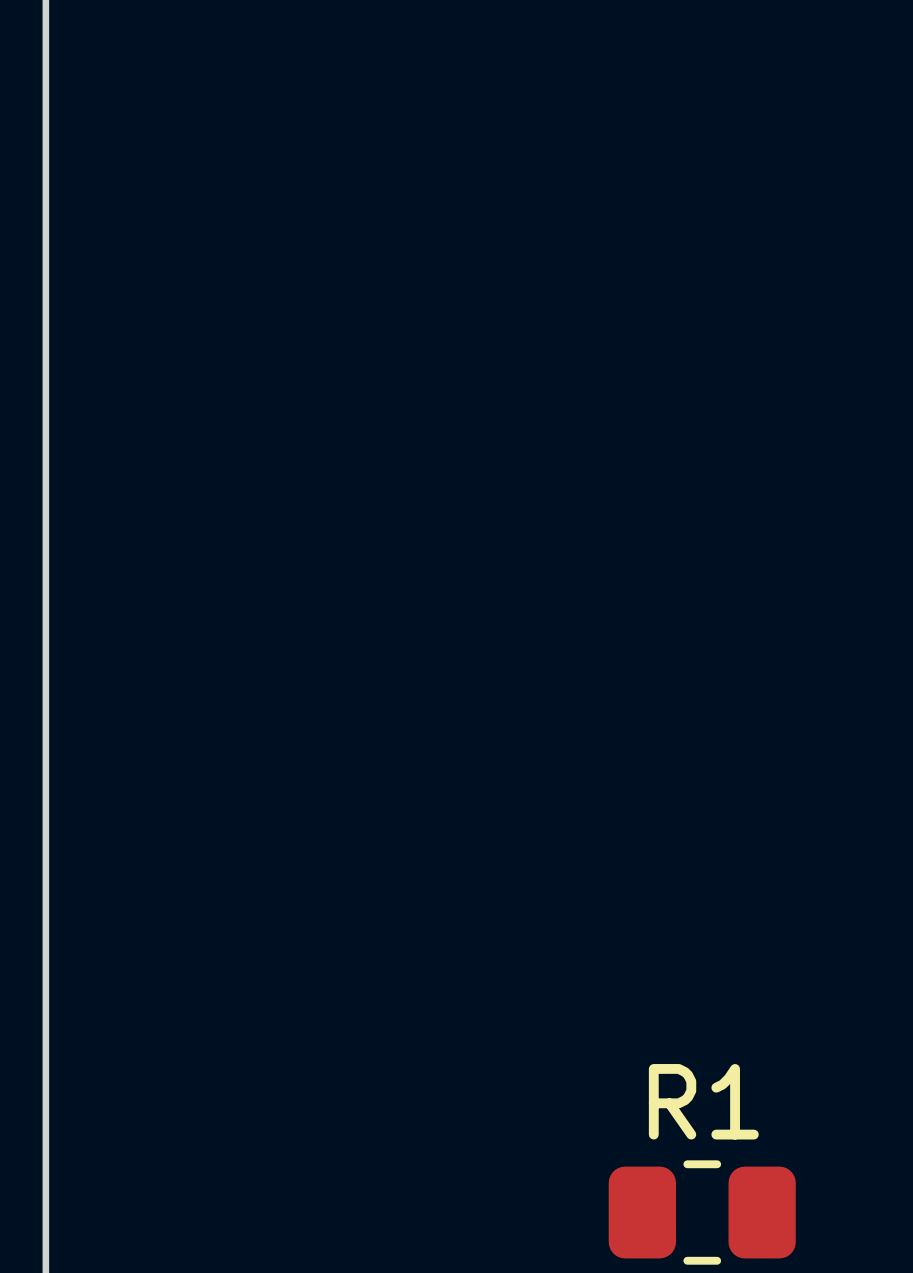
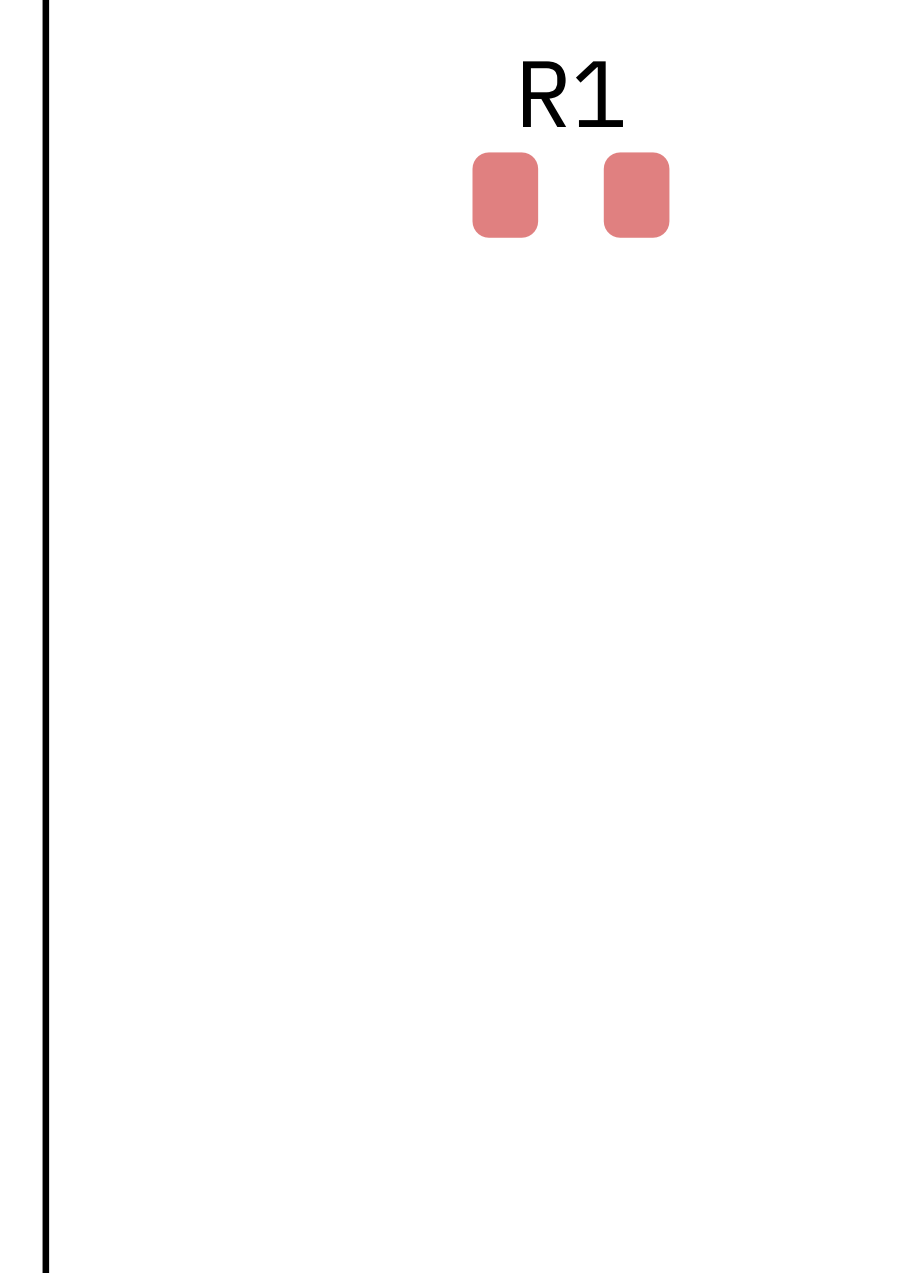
R1 footprint: [608, 1160, 796, 1265] -> [472, 152, 670, 238]

